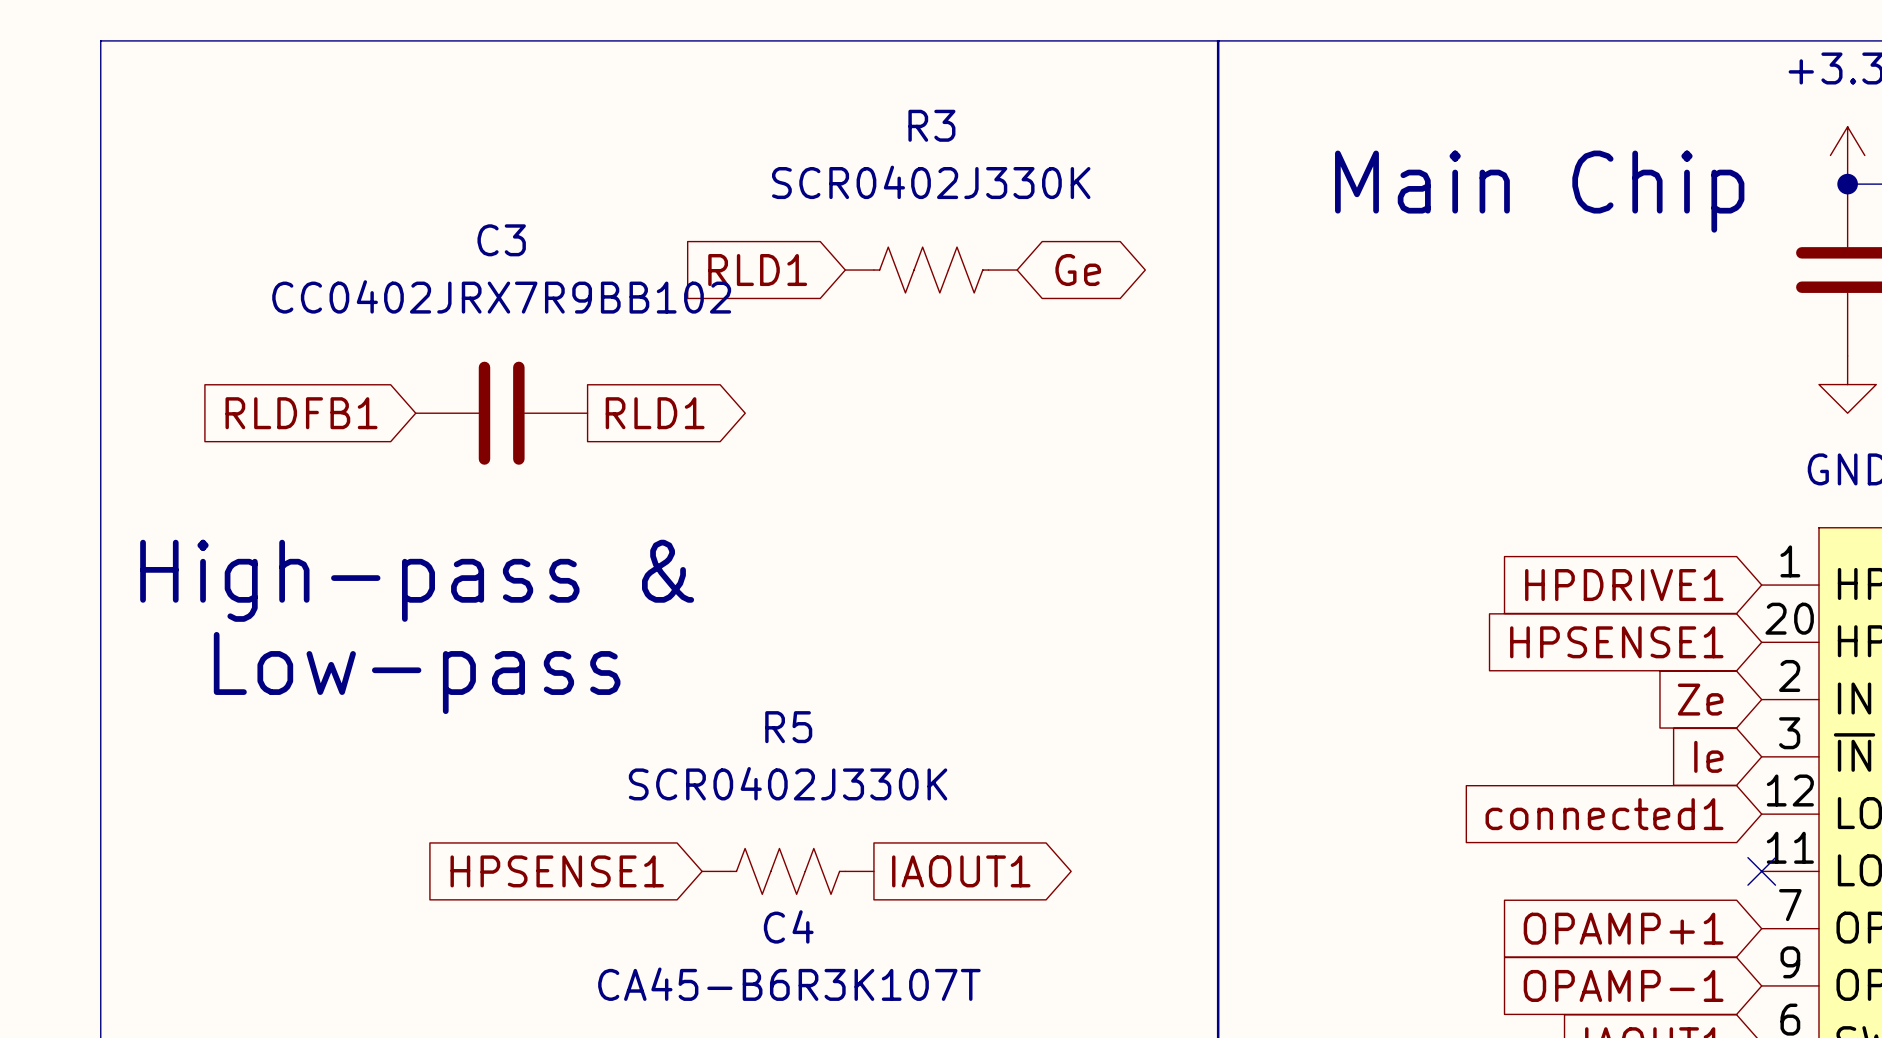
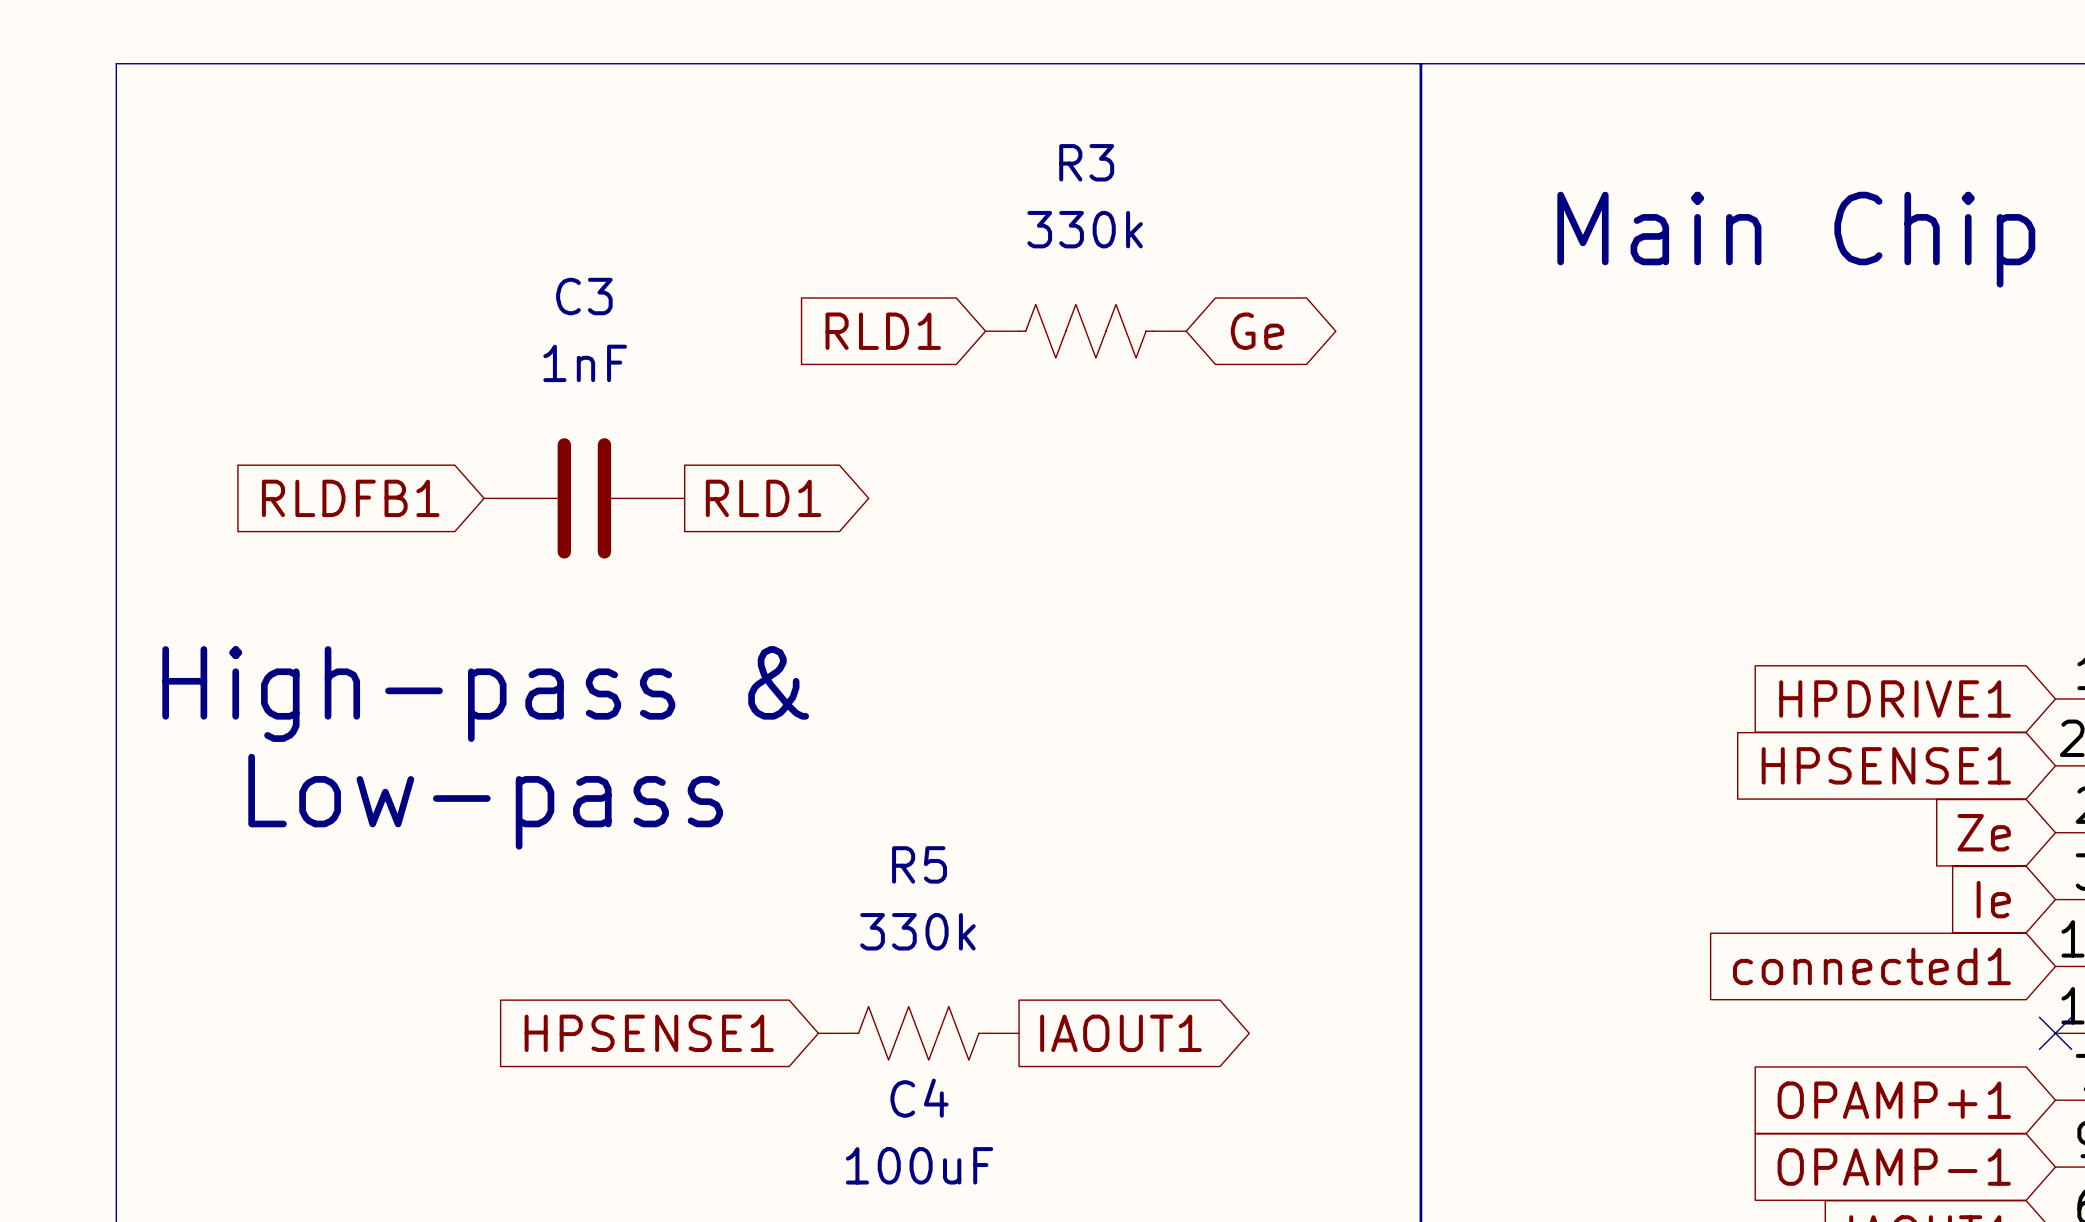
R3 value: SCR0402J330K (931, 182) -> 330k (1085, 229)
C3 value: CC0402JRX7R9BB102 (501, 296) -> 1nF (585, 363)
R5 value: SCR0402J330K (788, 783) -> 330k (917, 931)
C4 value: CA45-B6R3K107T (789, 984) -> 100uF (919, 1165)

